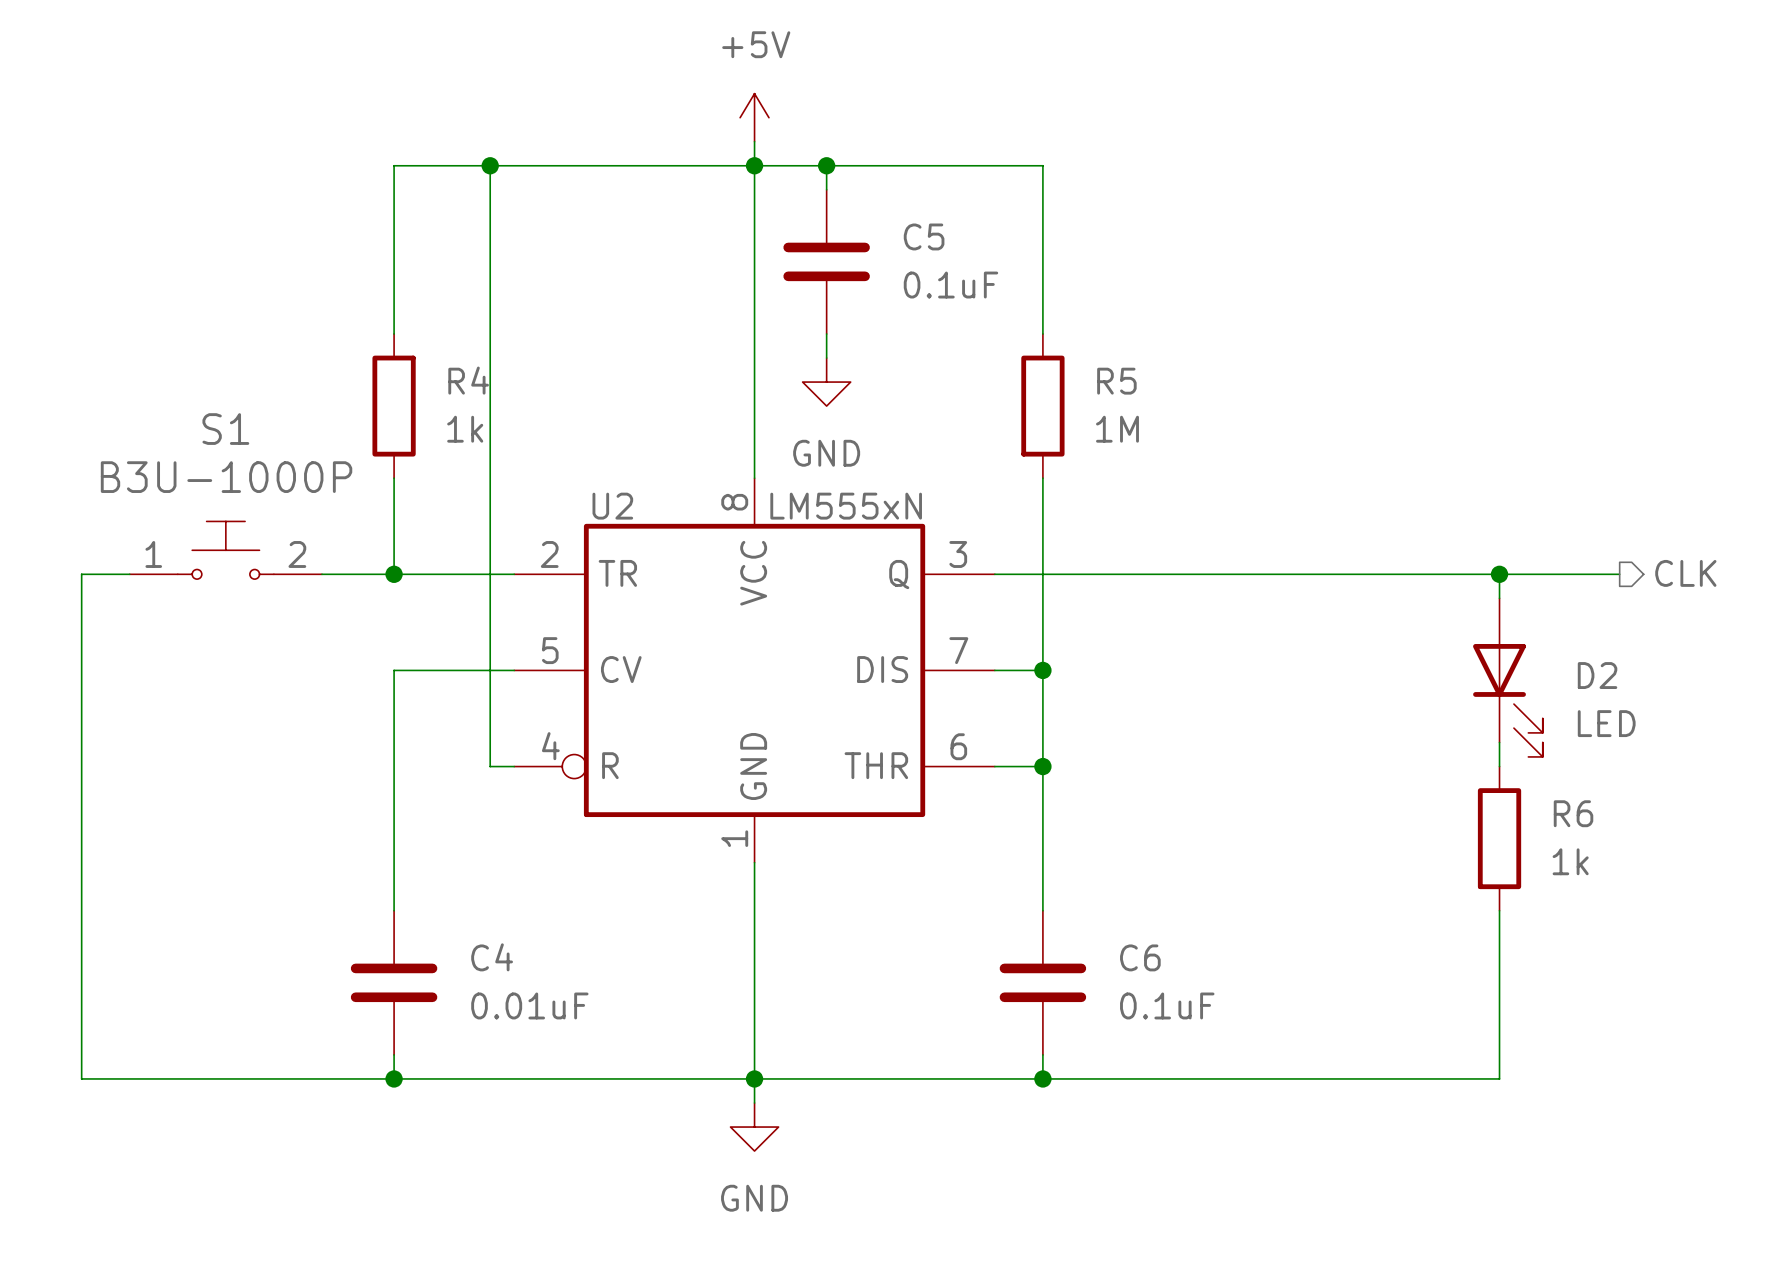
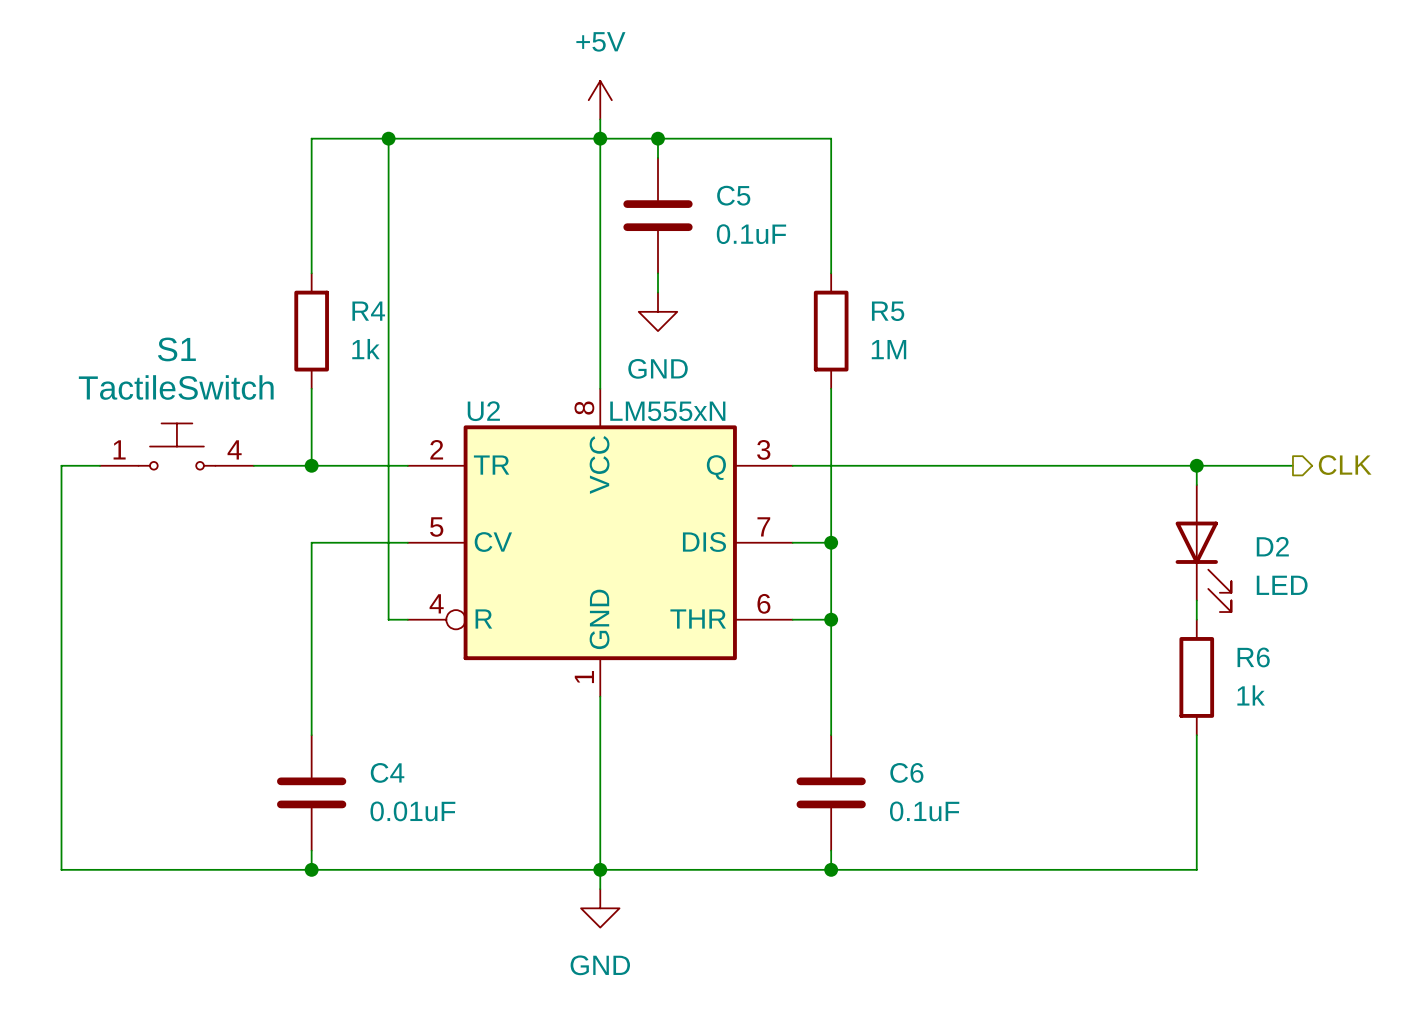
S1 value: B3U-1000P (226, 477) -> TactileSwitch (176, 387)
S1 pin number: 2 (297, 554) -> 4 (234, 449)

